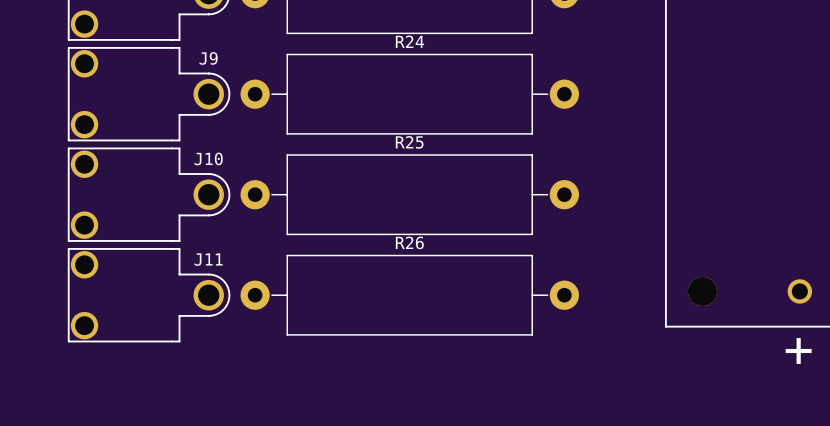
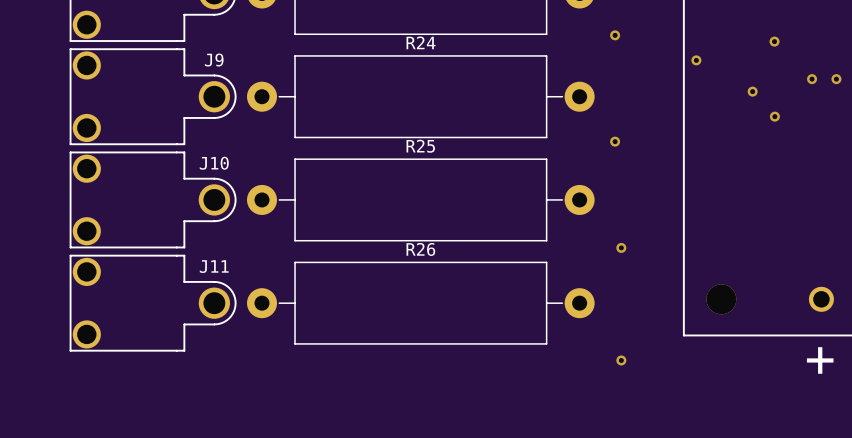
via: none -> (615, 35)
via: none -> (774, 41)
via: none -> (696, 60)
via: none -> (812, 79)
via: none -> (836, 79)
via: none -> (752, 91)
via: none -> (774, 116)
via: none -> (615, 141)
via: none -> (621, 247)
via: none -> (621, 360)

